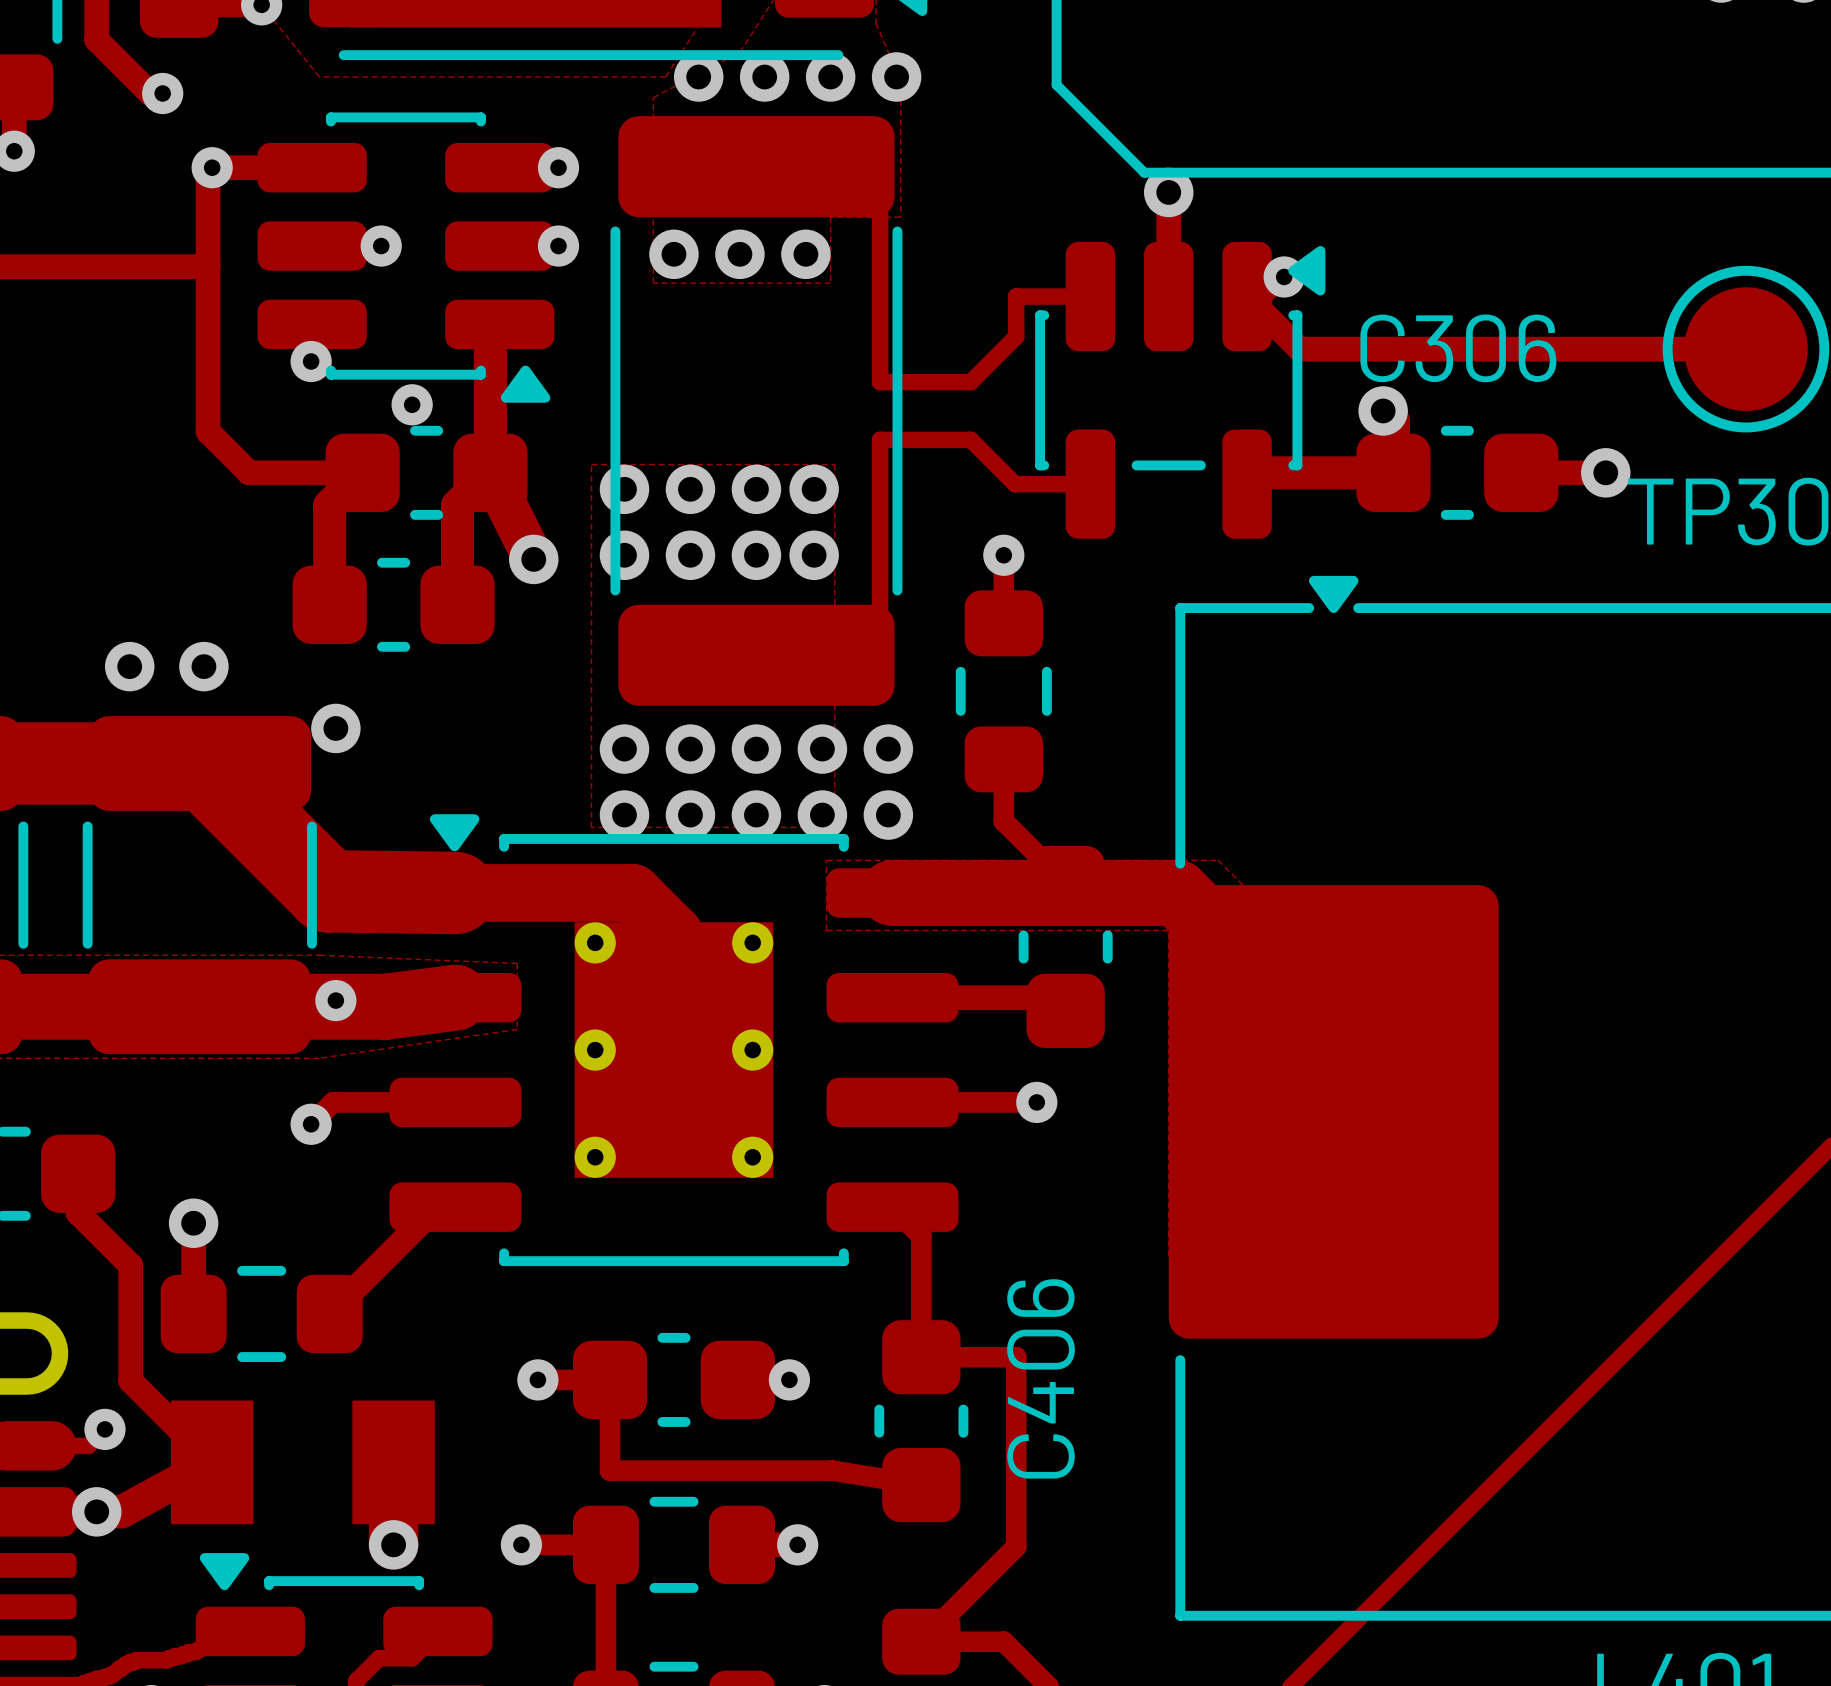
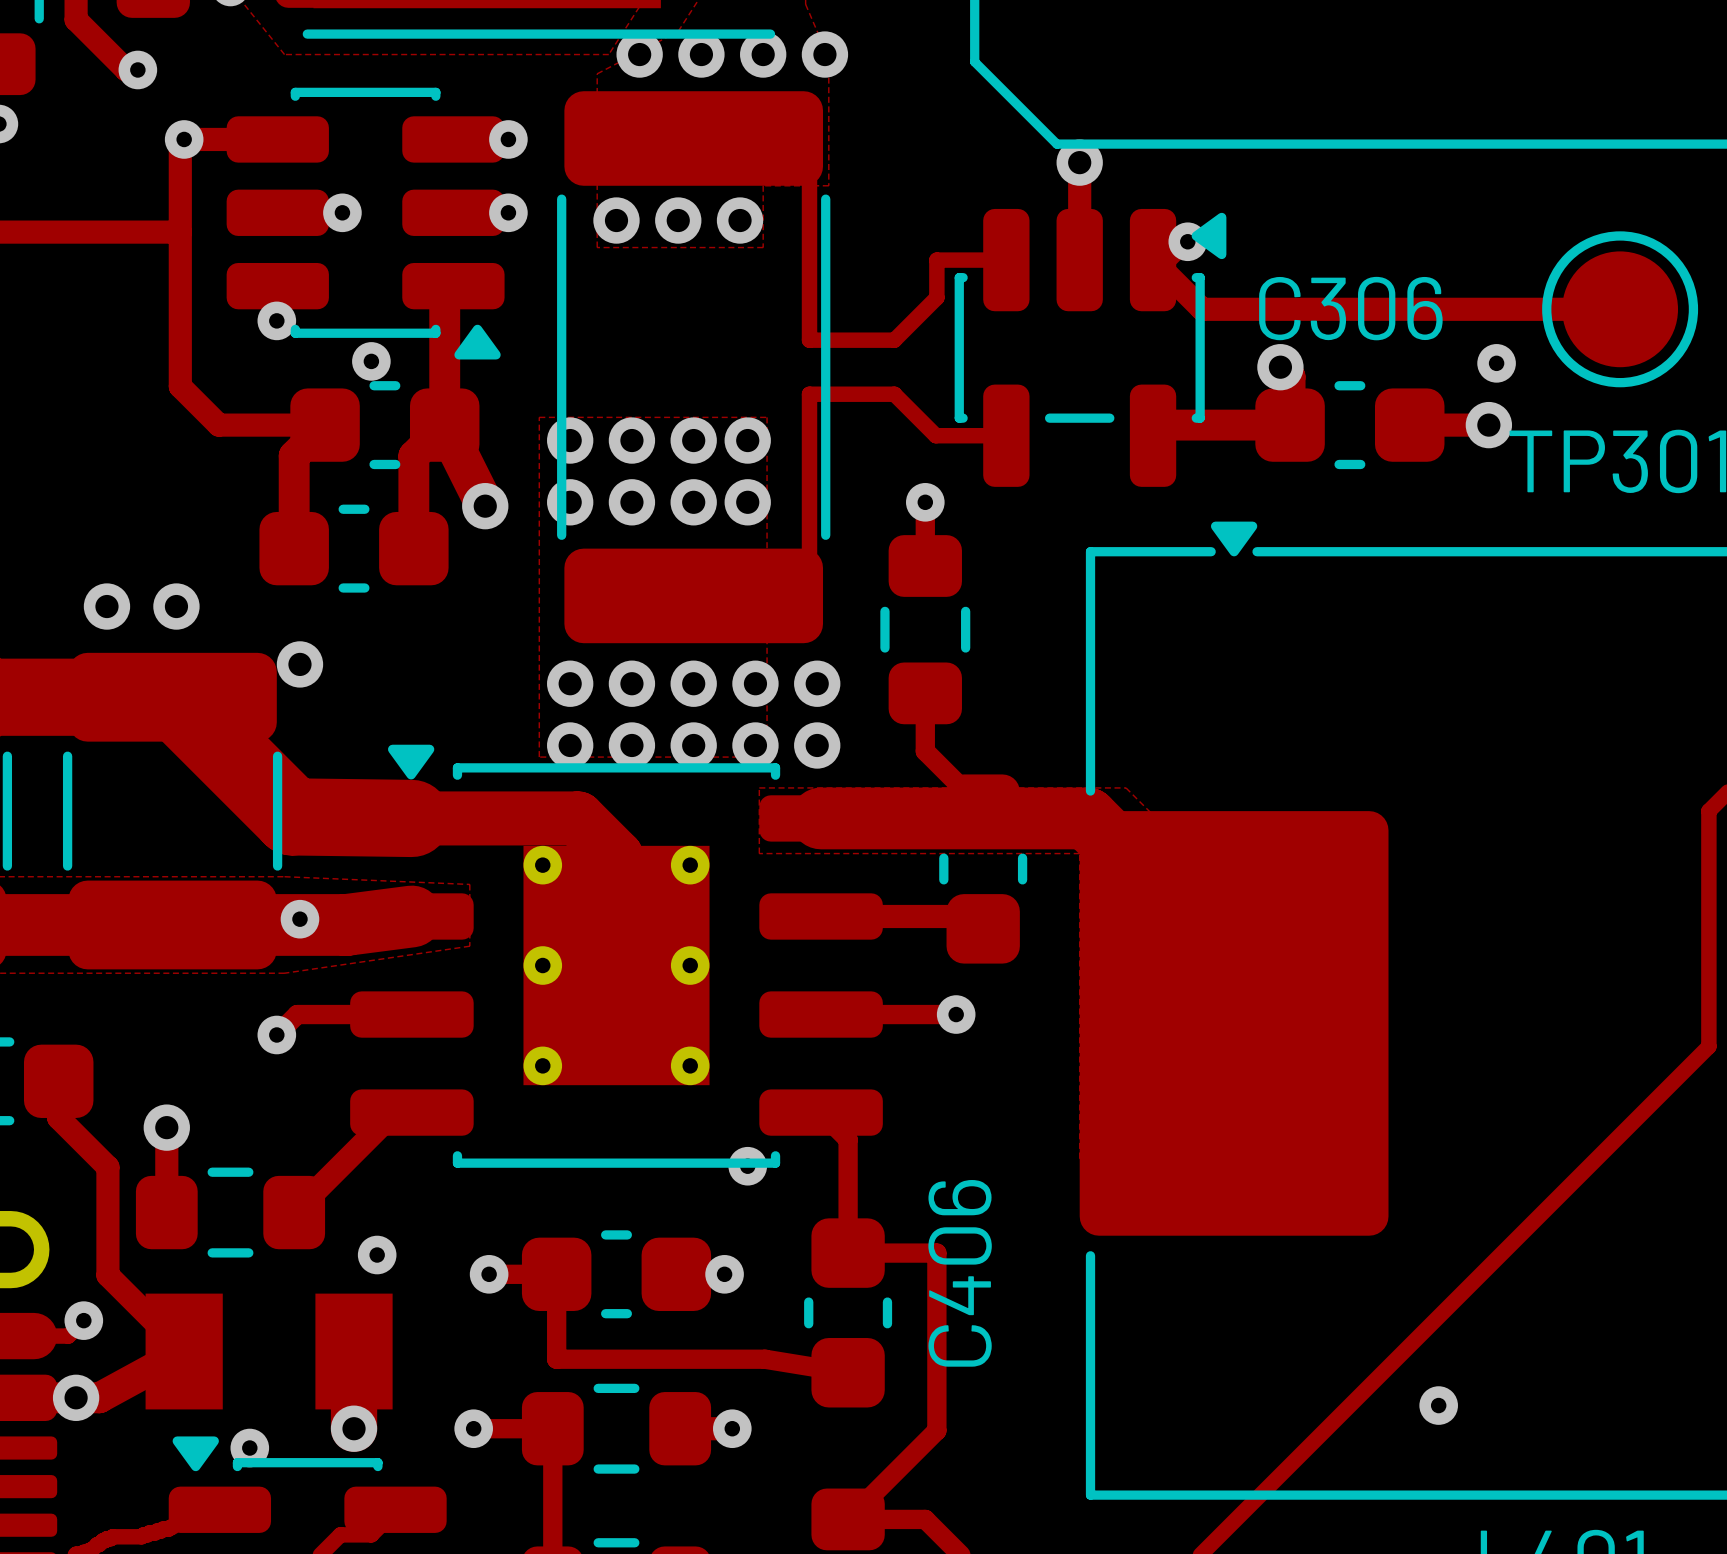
via: none -> (1496, 363)
via: none -> (747, 1166)
via: none -> (377, 1255)
via: none -> (1438, 1405)
via: none -> (249, 1448)

